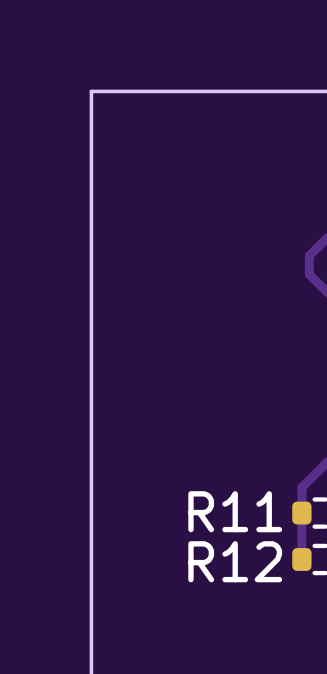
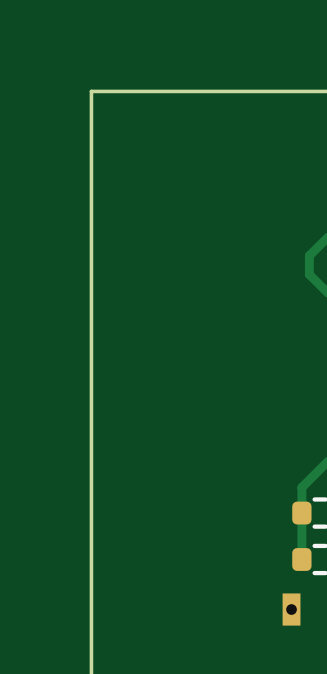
R11 name: R11 (235, 511) -> none
R12 name: R12 (235, 561) -> none
part: none -> (291, 609)

